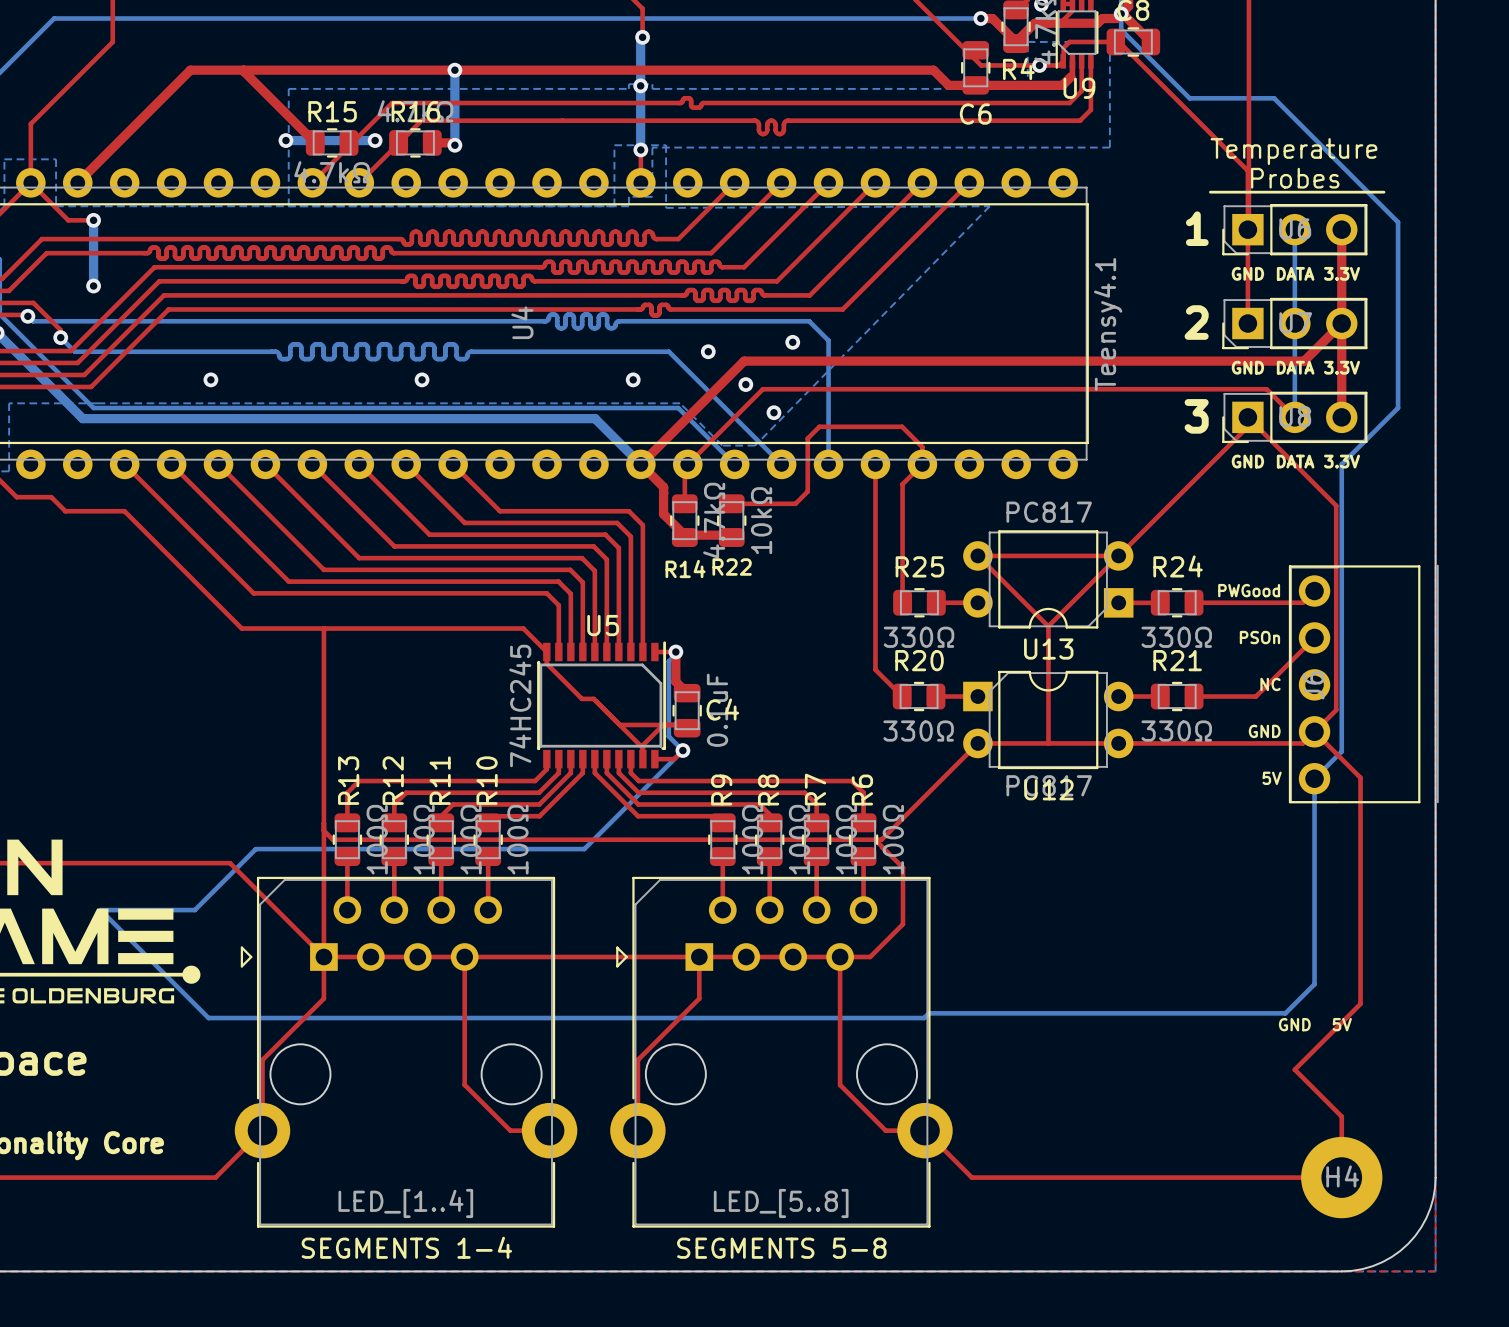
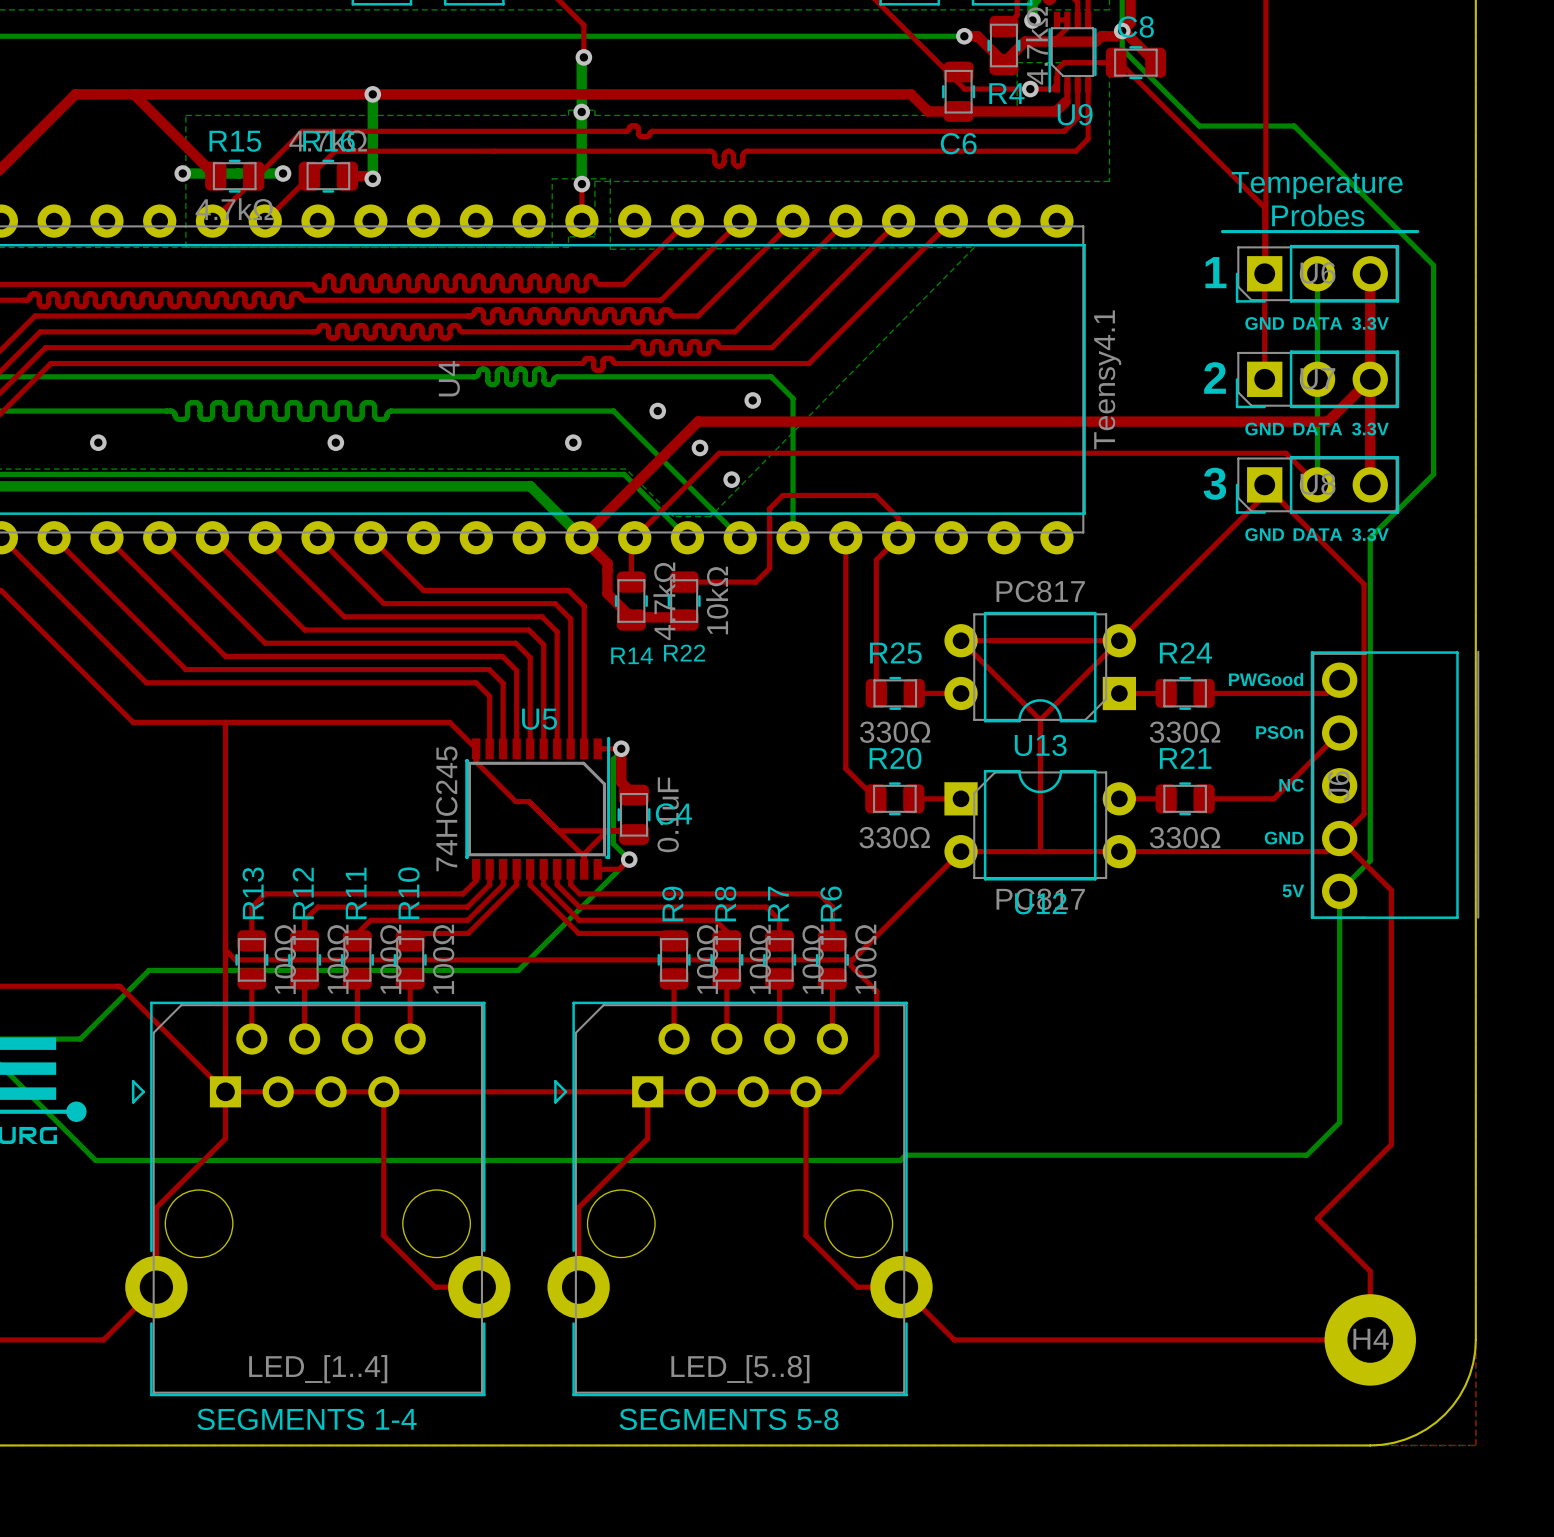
text: GND (1294, 1024) -> none
text: 5V (1342, 1024) -> none

